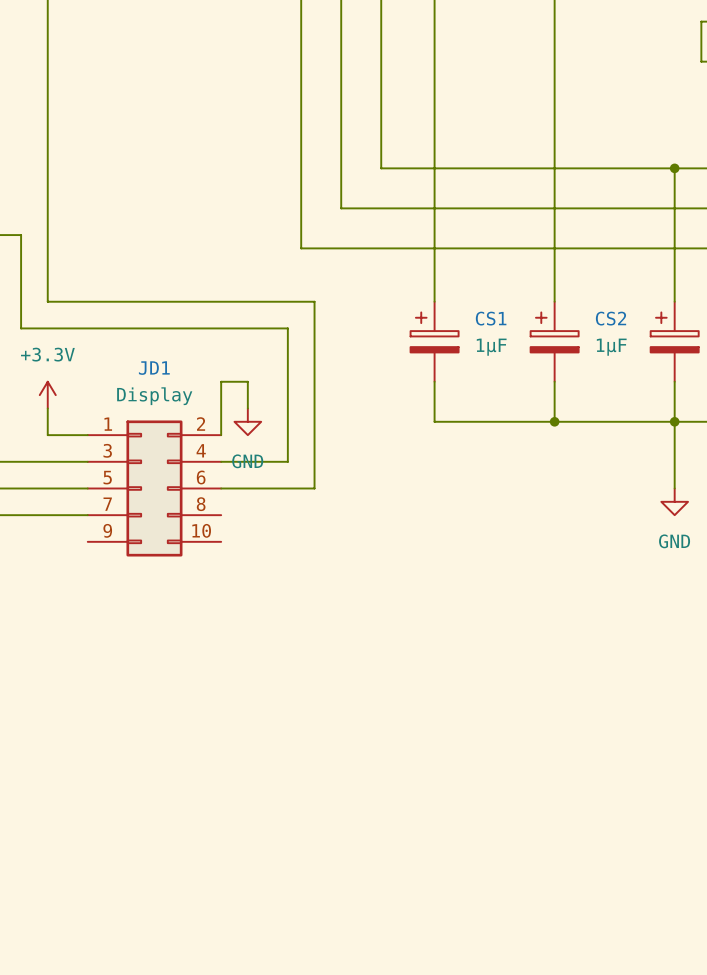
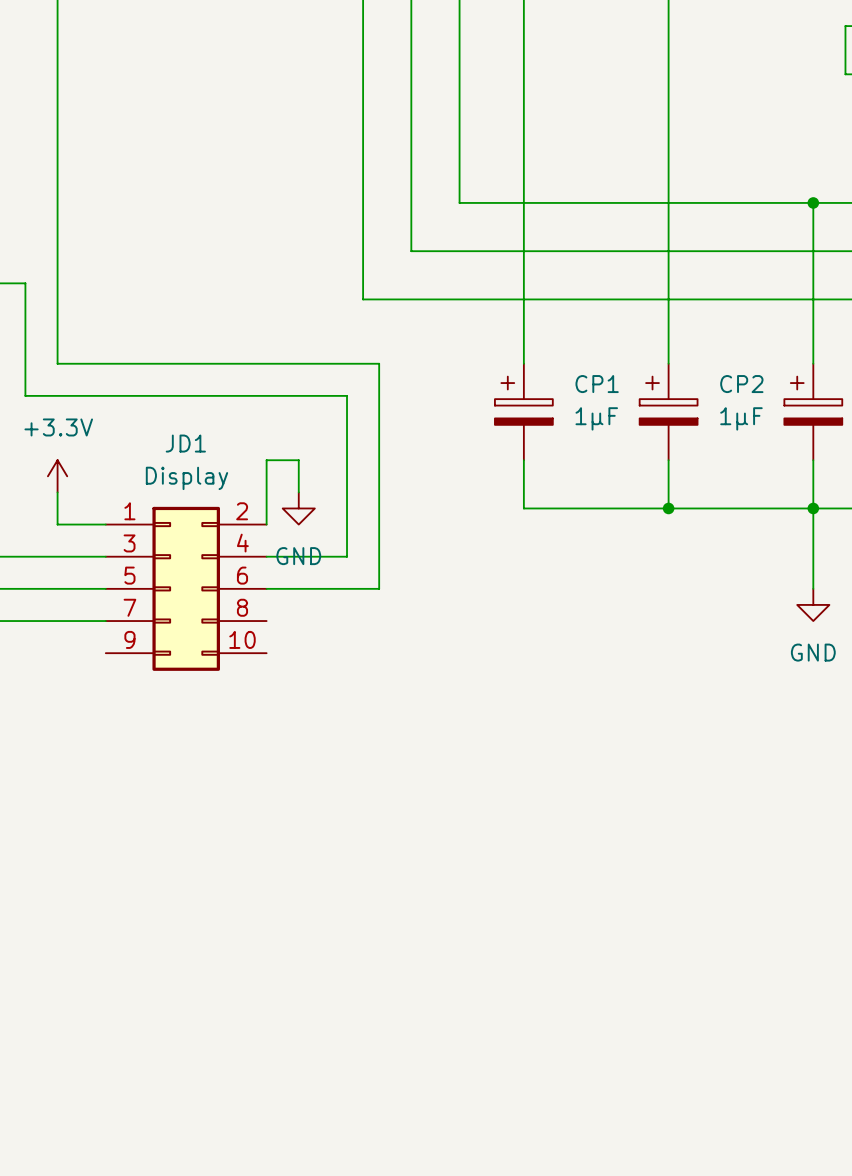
CS1 name: CS1 (491, 318) -> CP1 (597, 384)
CS2 name: CS2 (611, 318) -> CP2 (741, 384)

